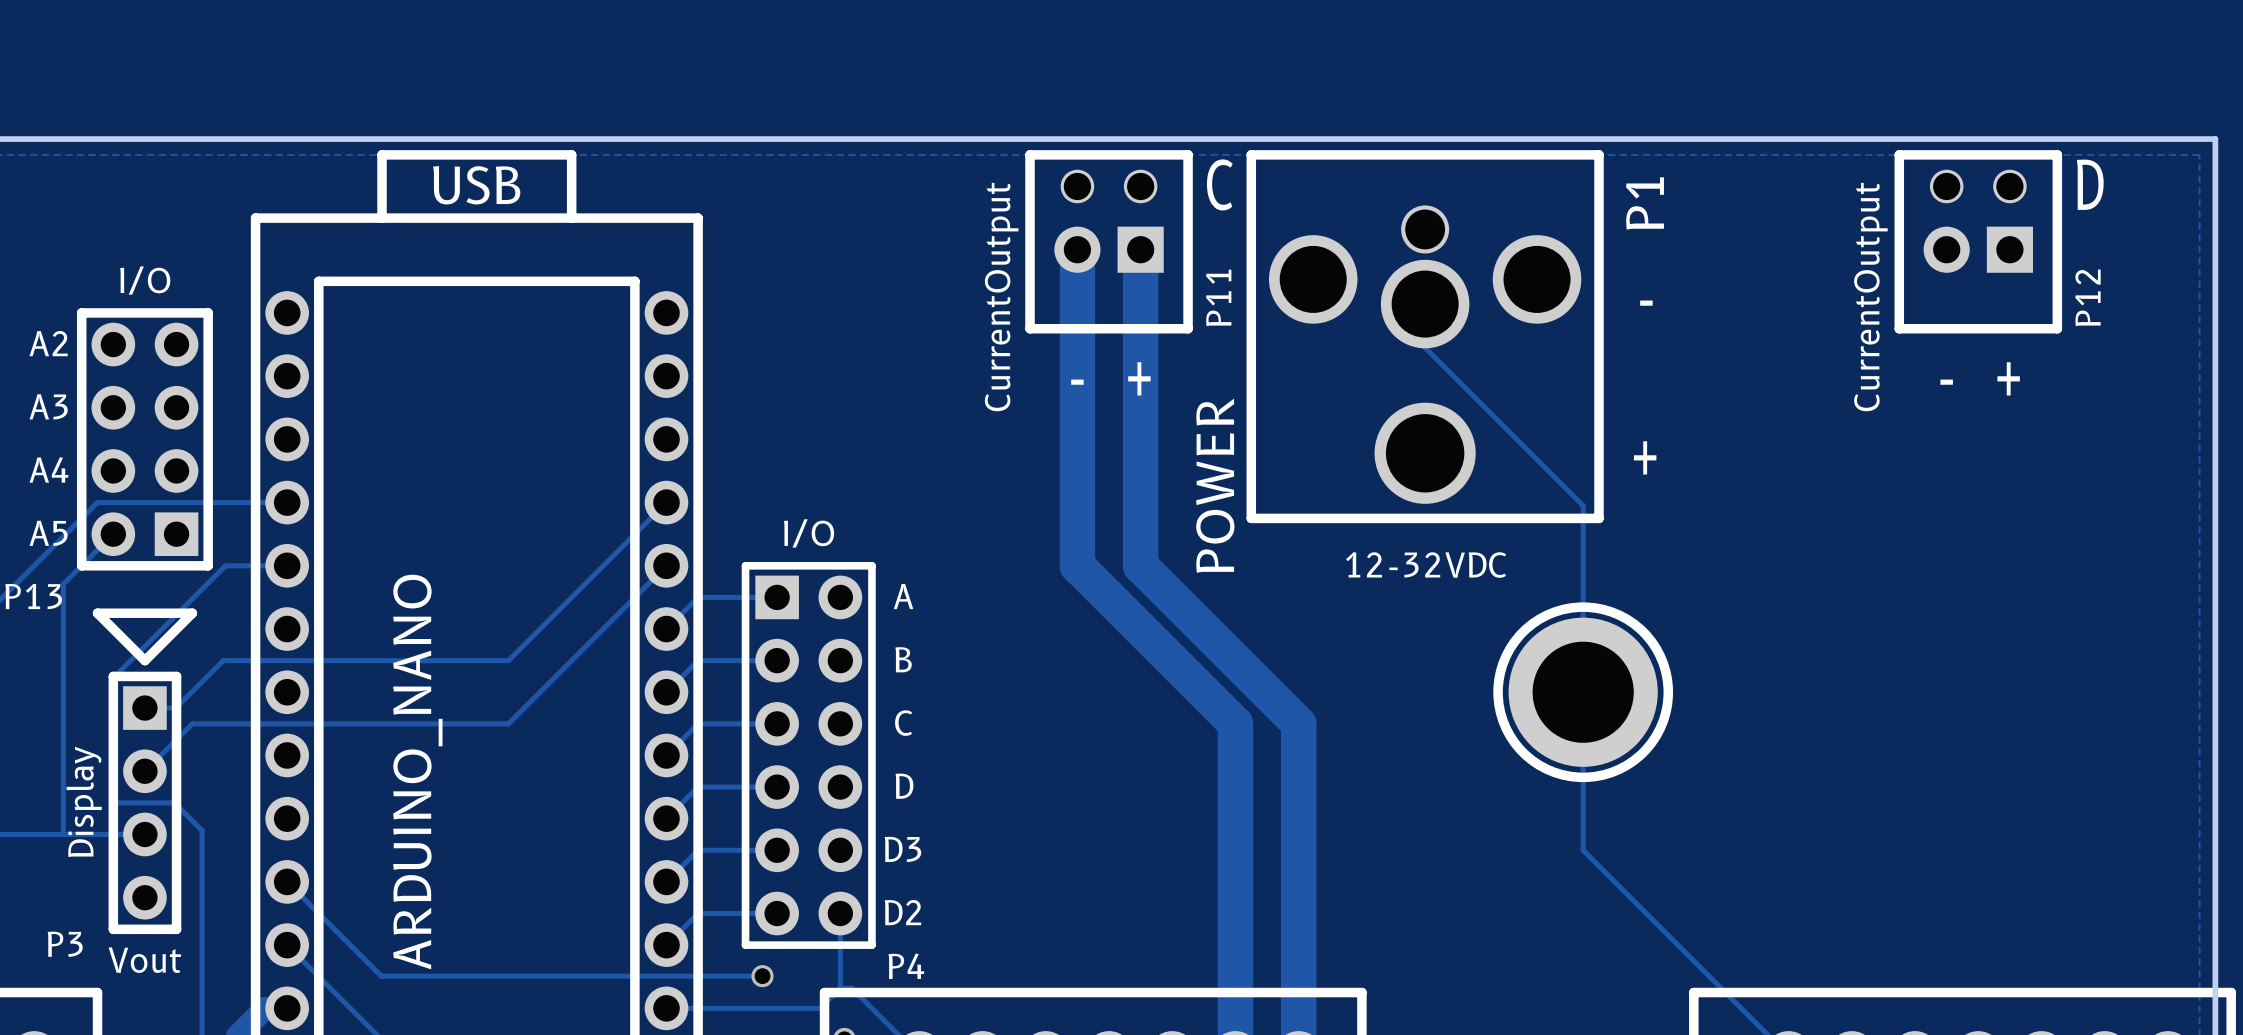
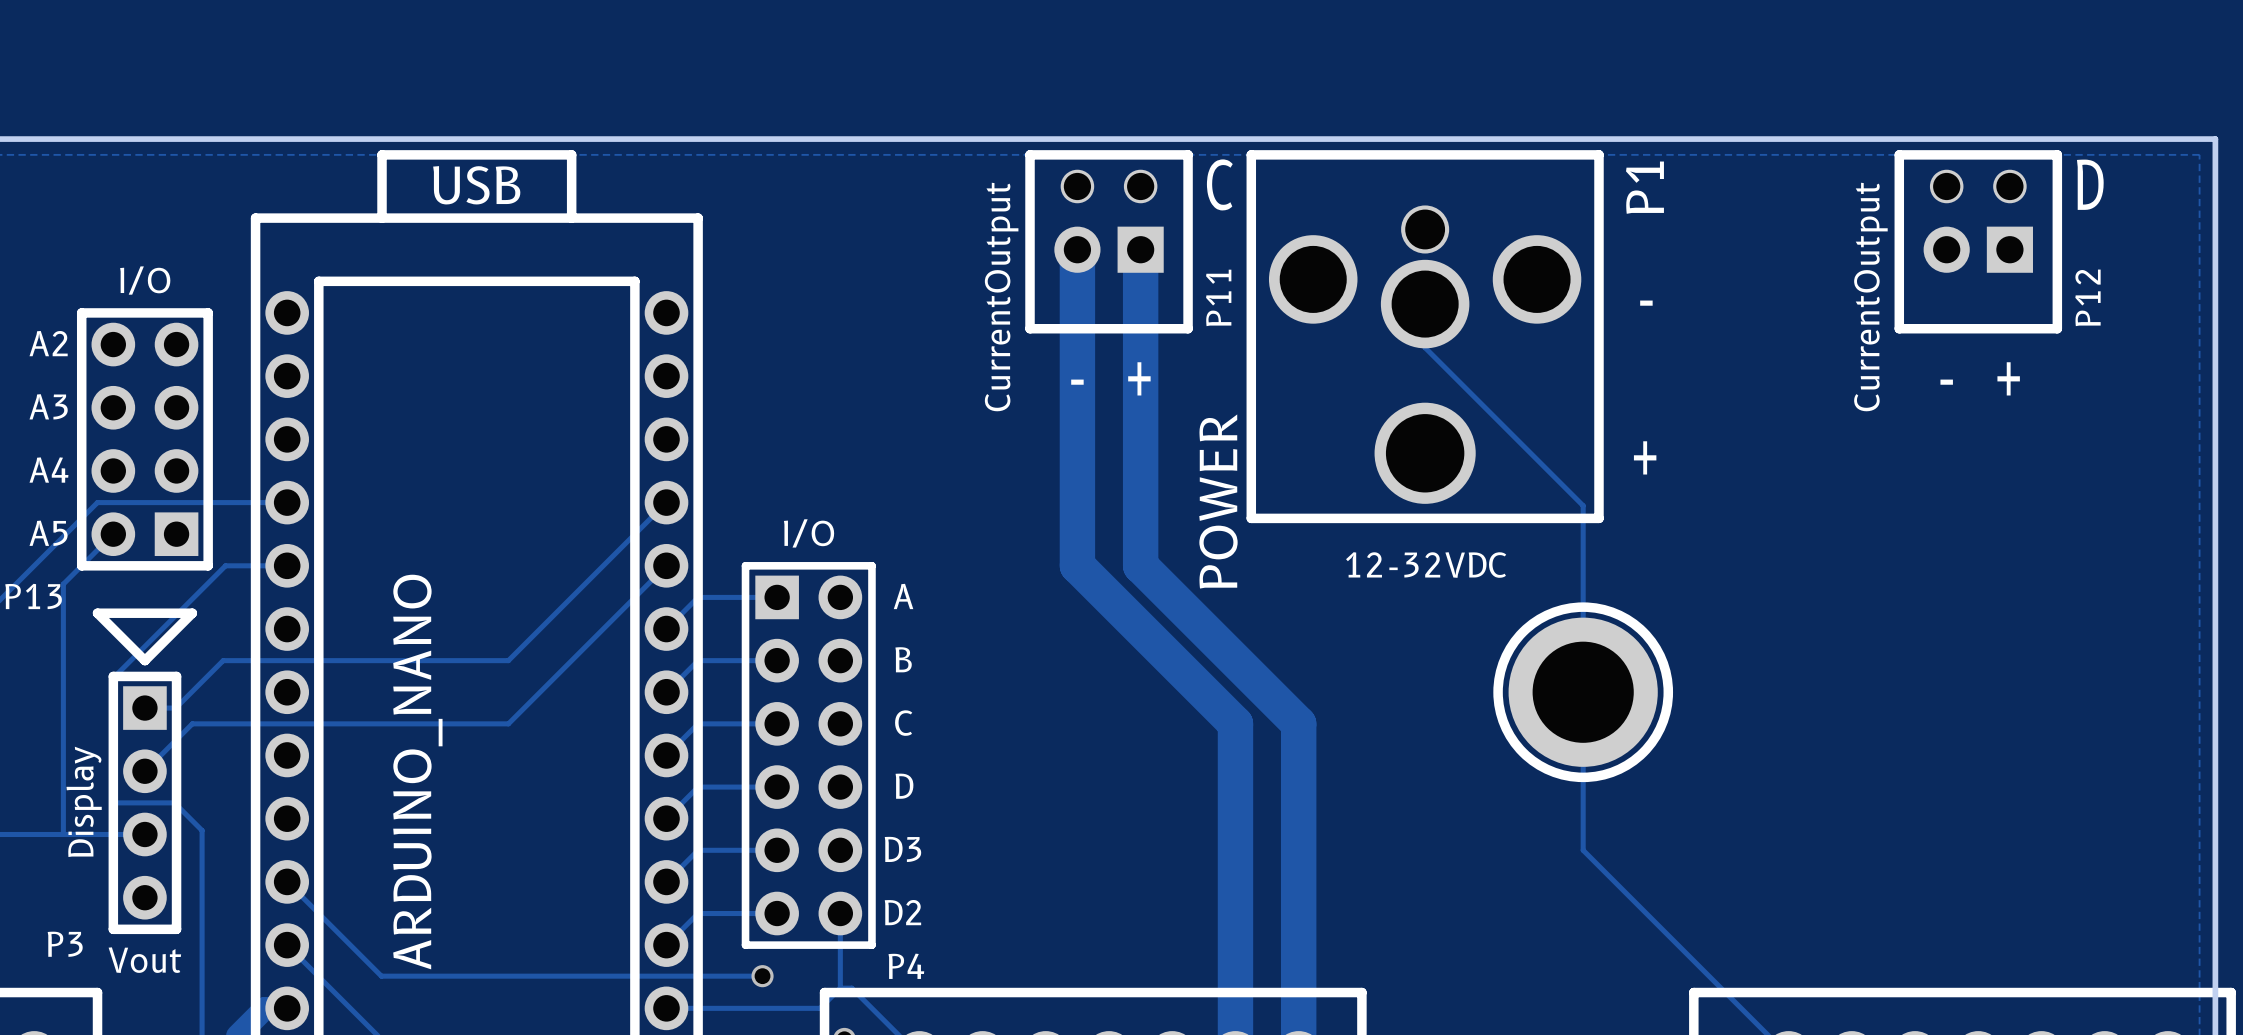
P1 name position: P1 (1644, 203) -> P1 (1644, 187)
P1 value position: POWER (1215, 485) -> POWER (1218, 501)

